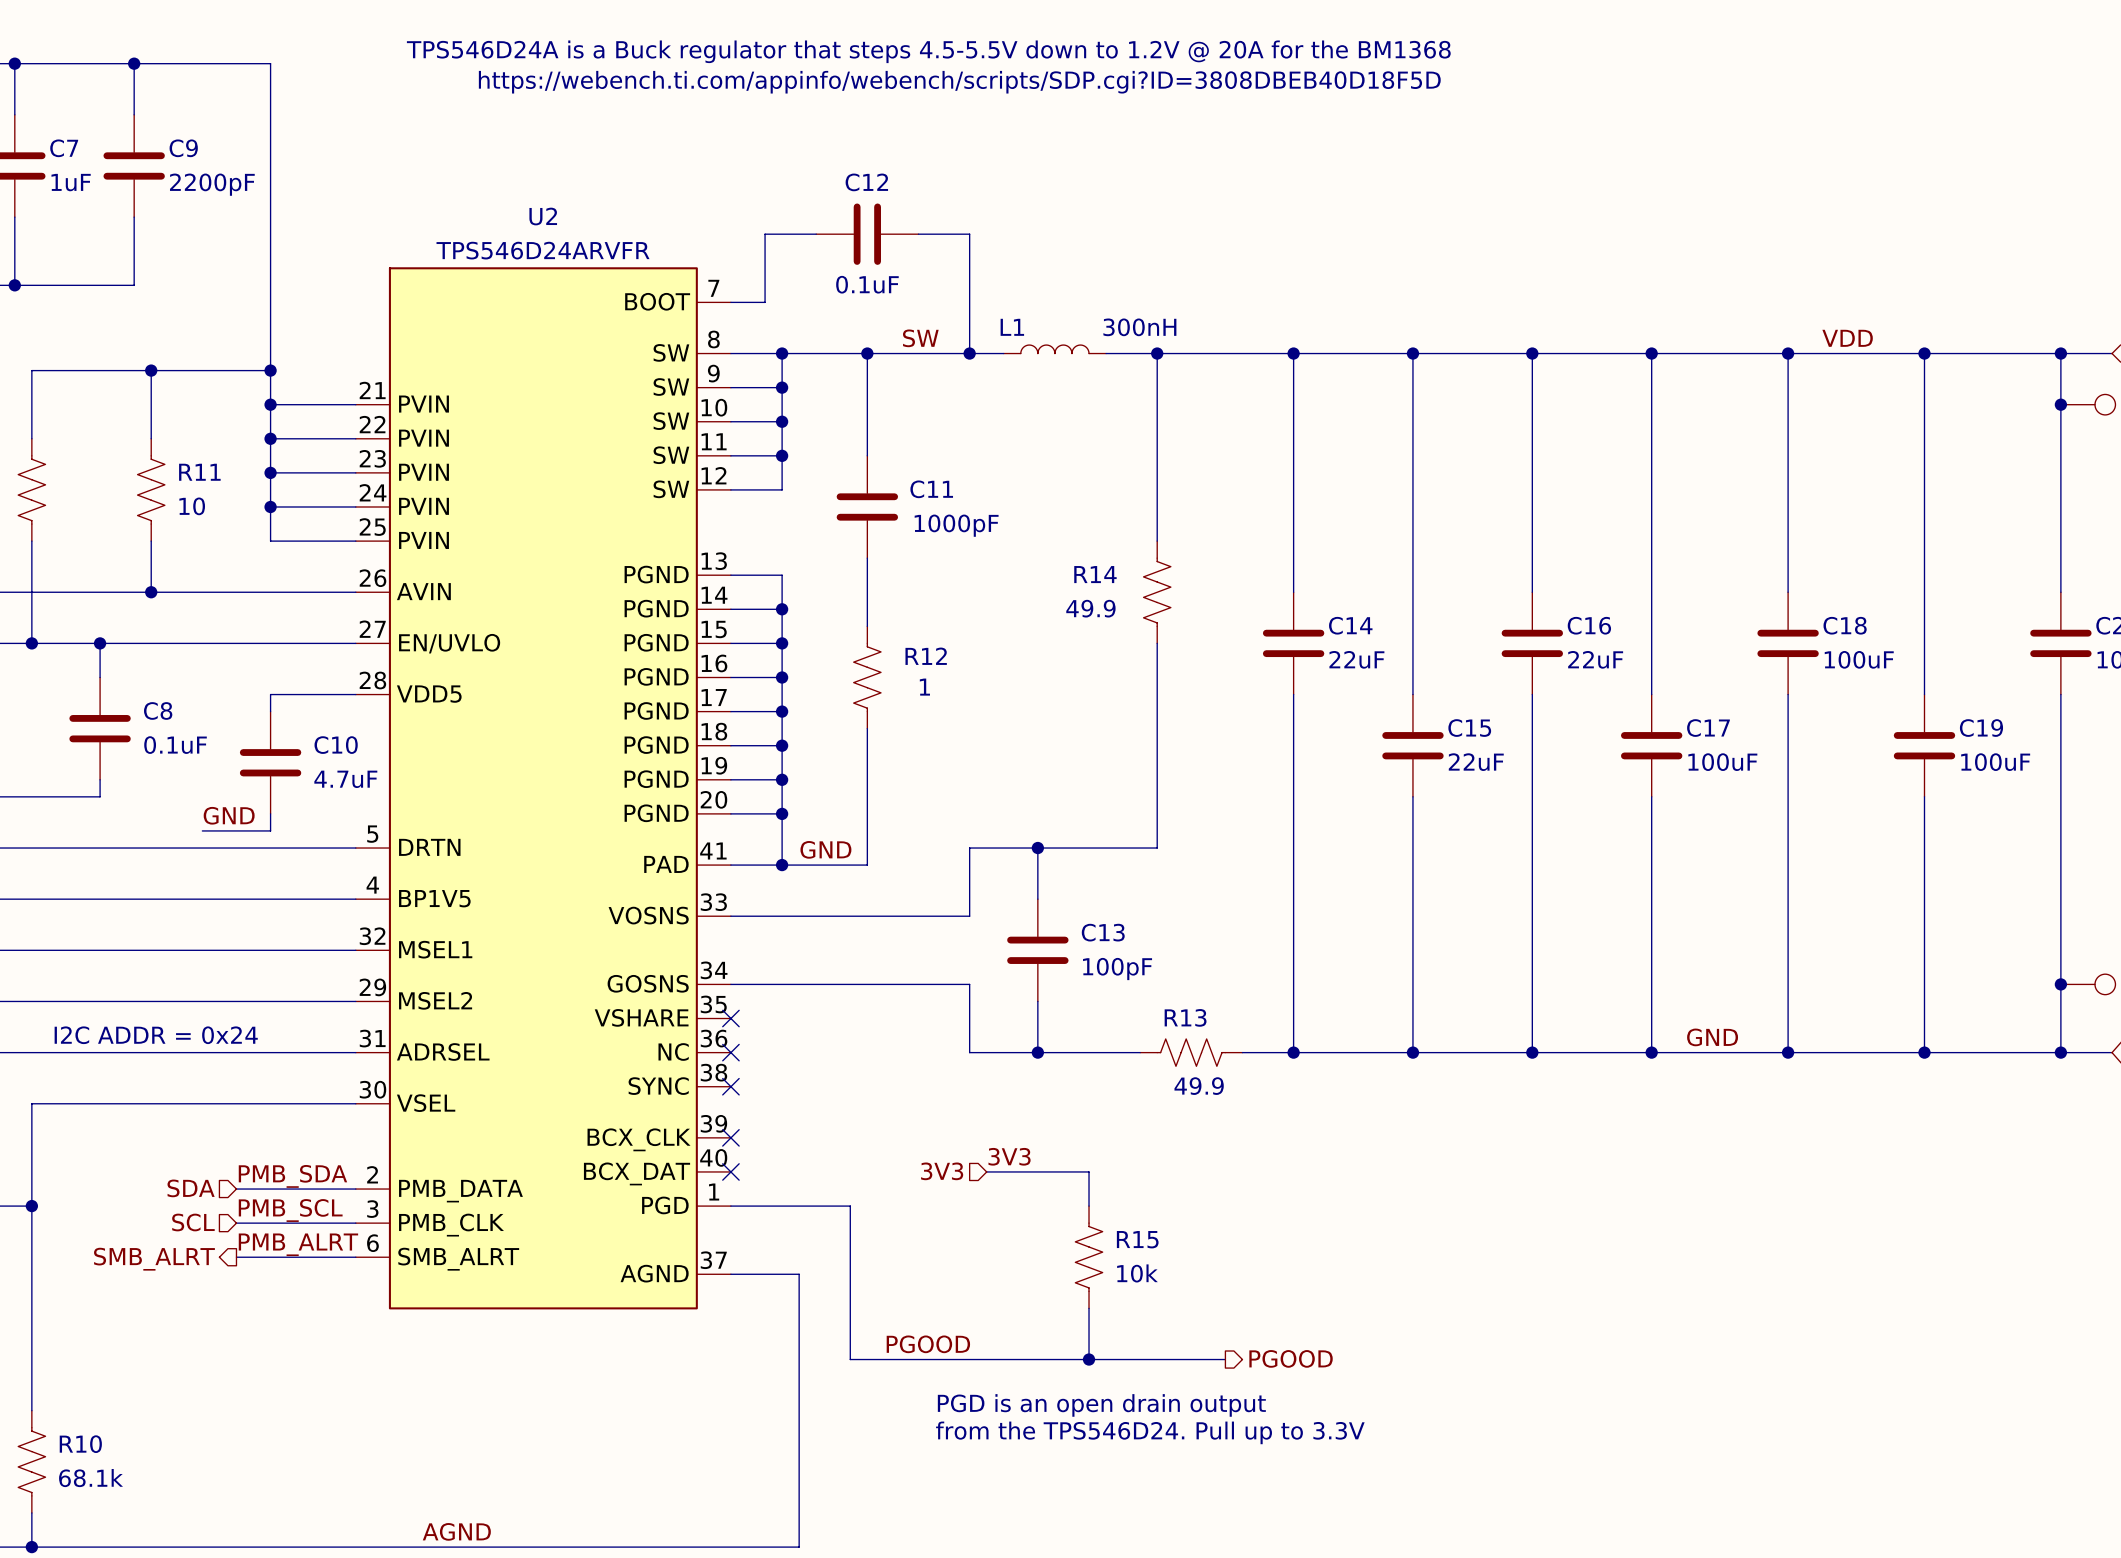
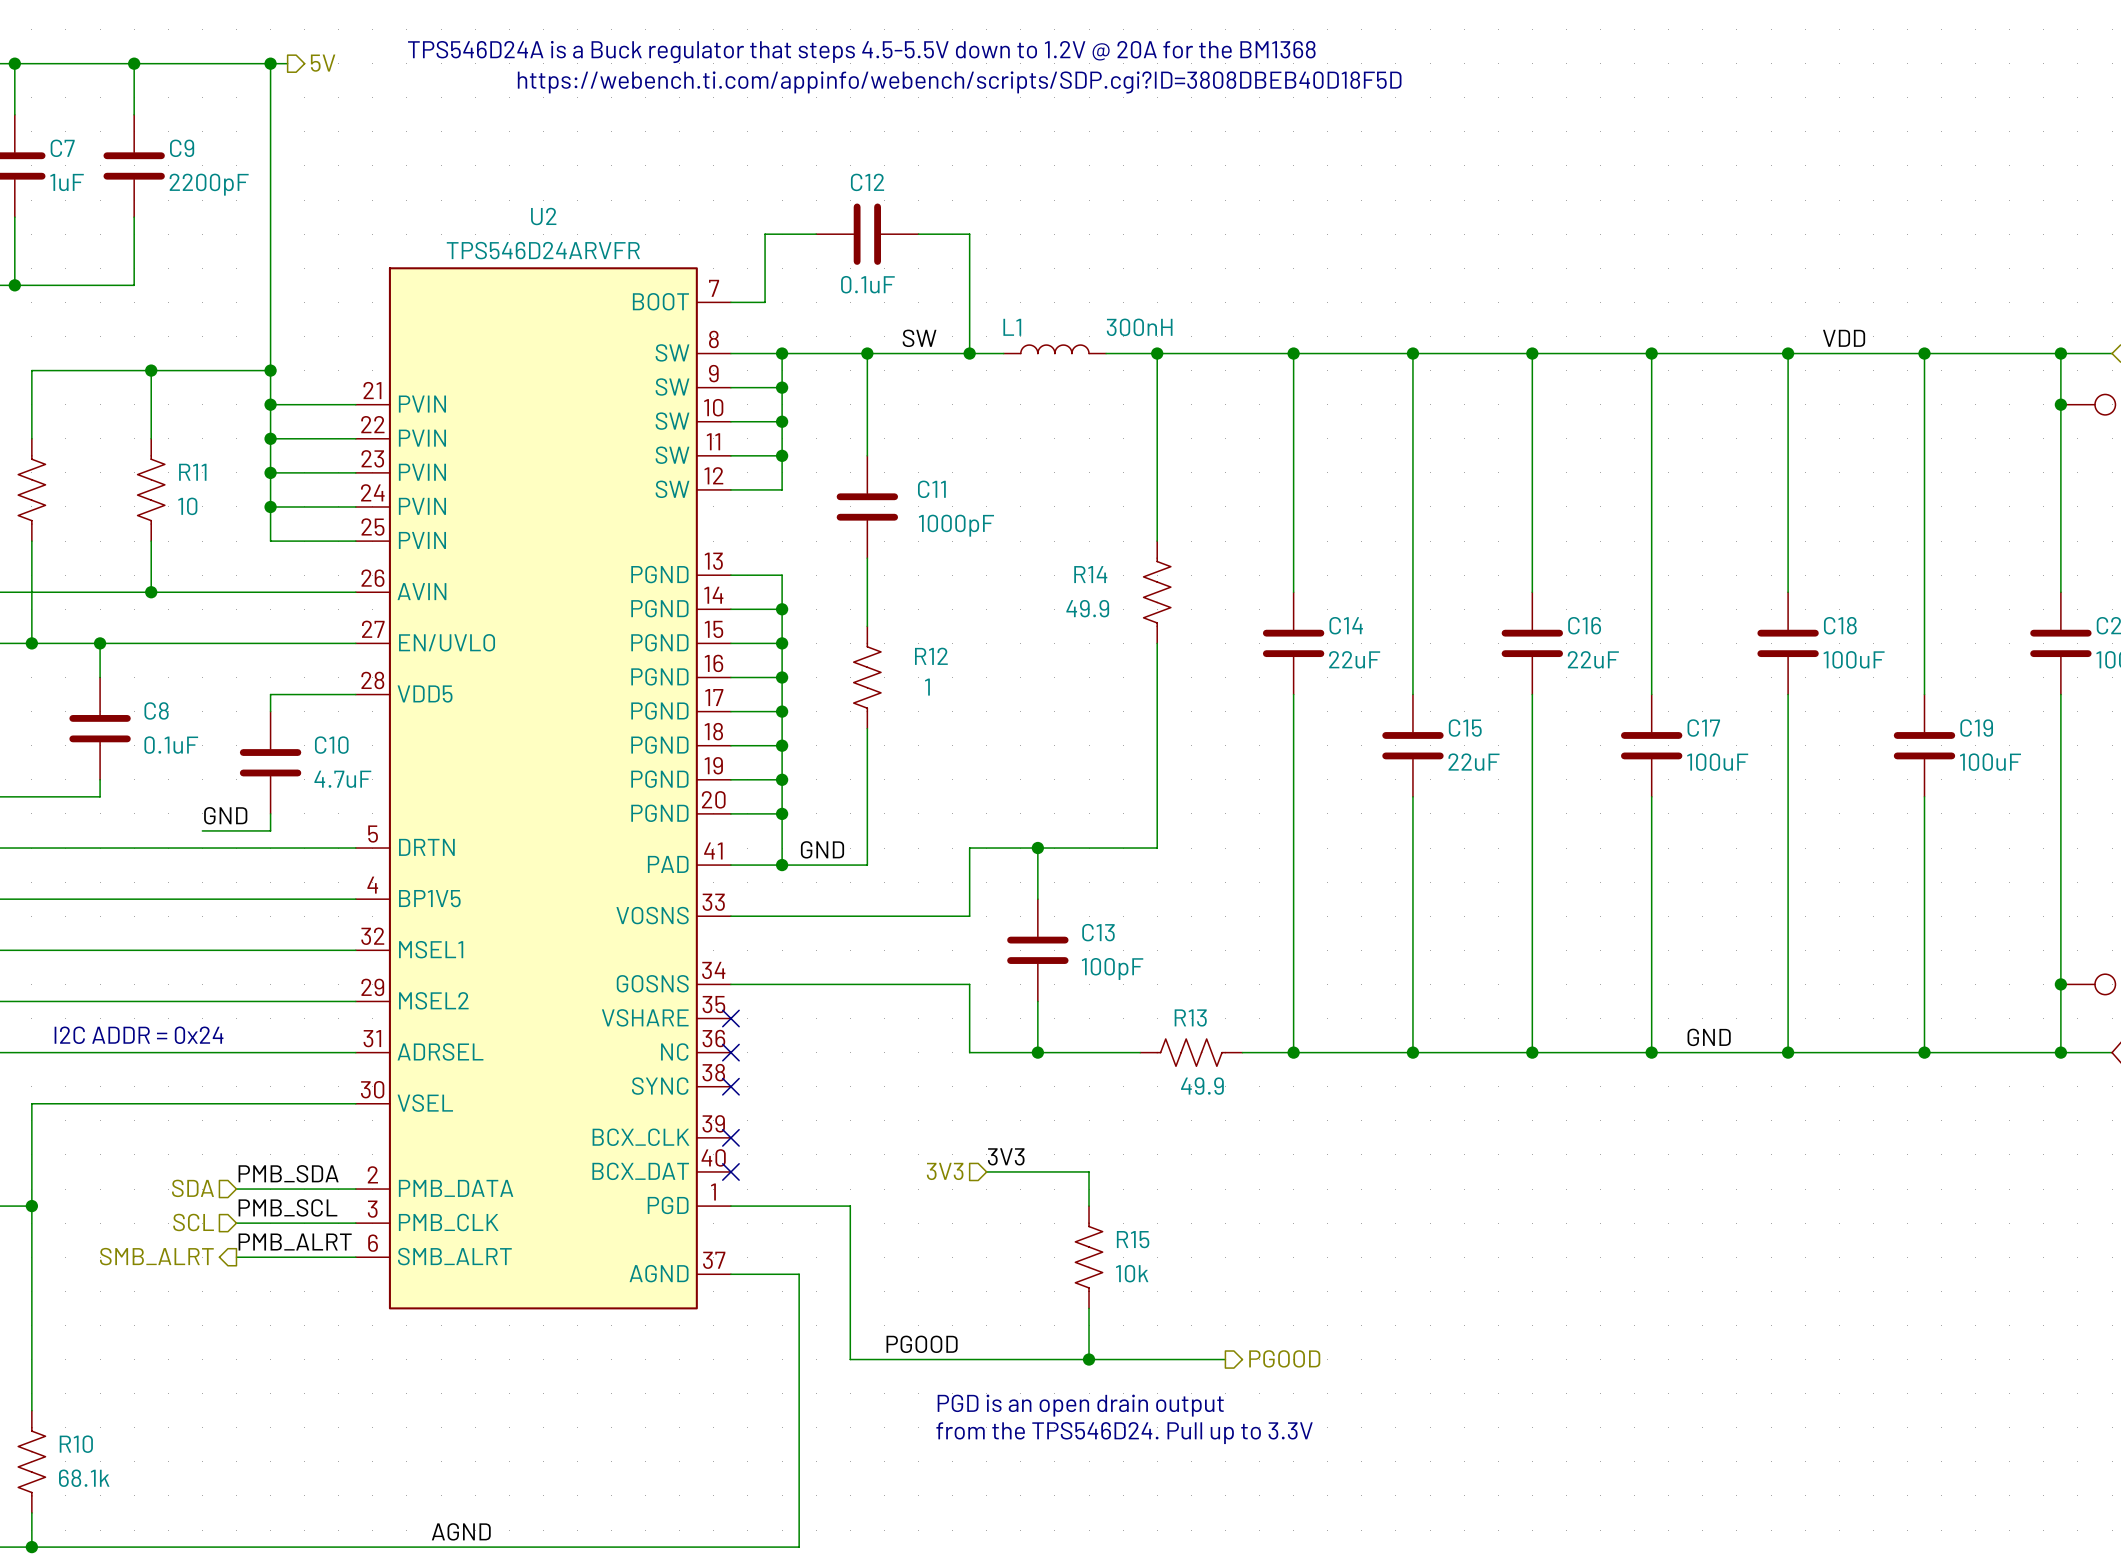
wire: none -> (270, 63) (287, 63)
junction: none -> (270, 63)
hierarchical label: none -> 5V (323, 63)

